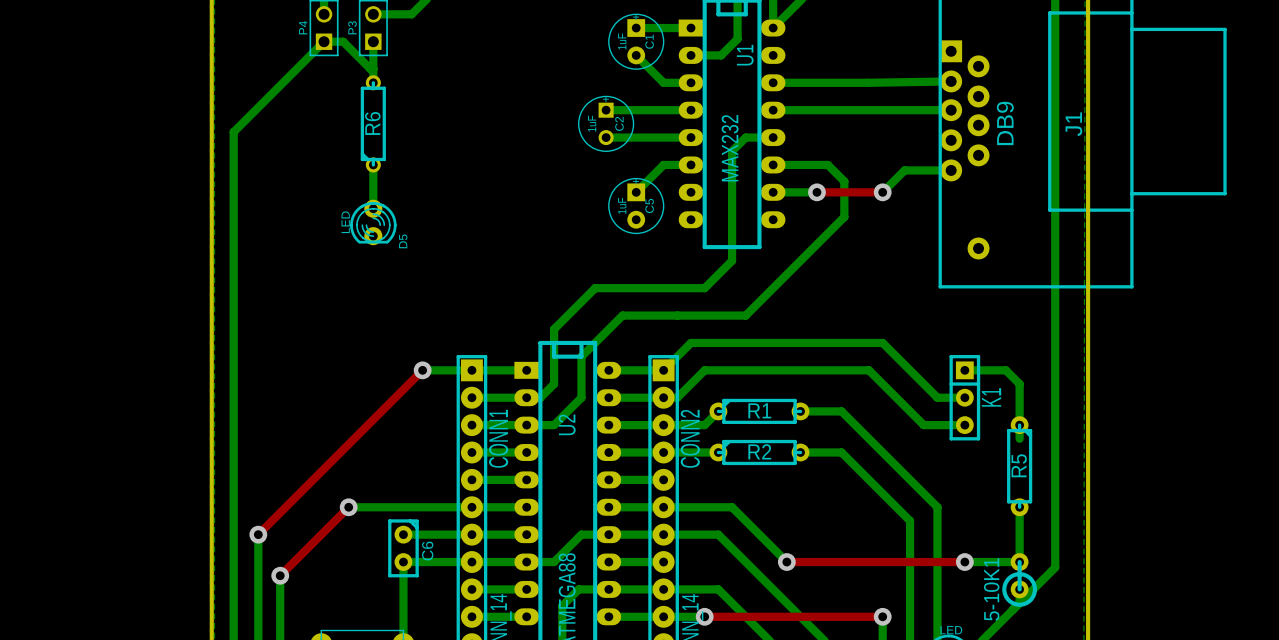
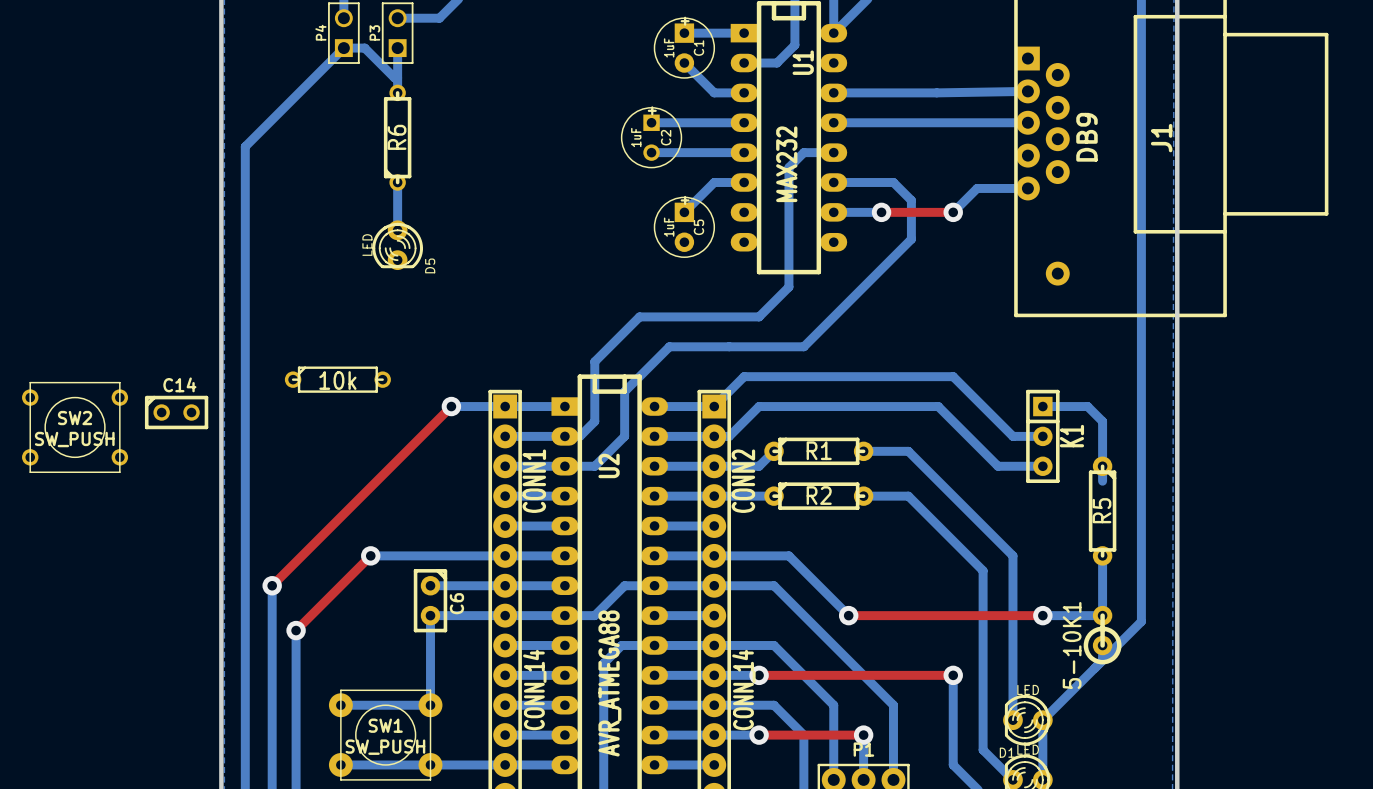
part: none -> 10k (337, 379)
C14: none -> (176, 412)
SW2: none -> SW_PUSH (75, 427)

